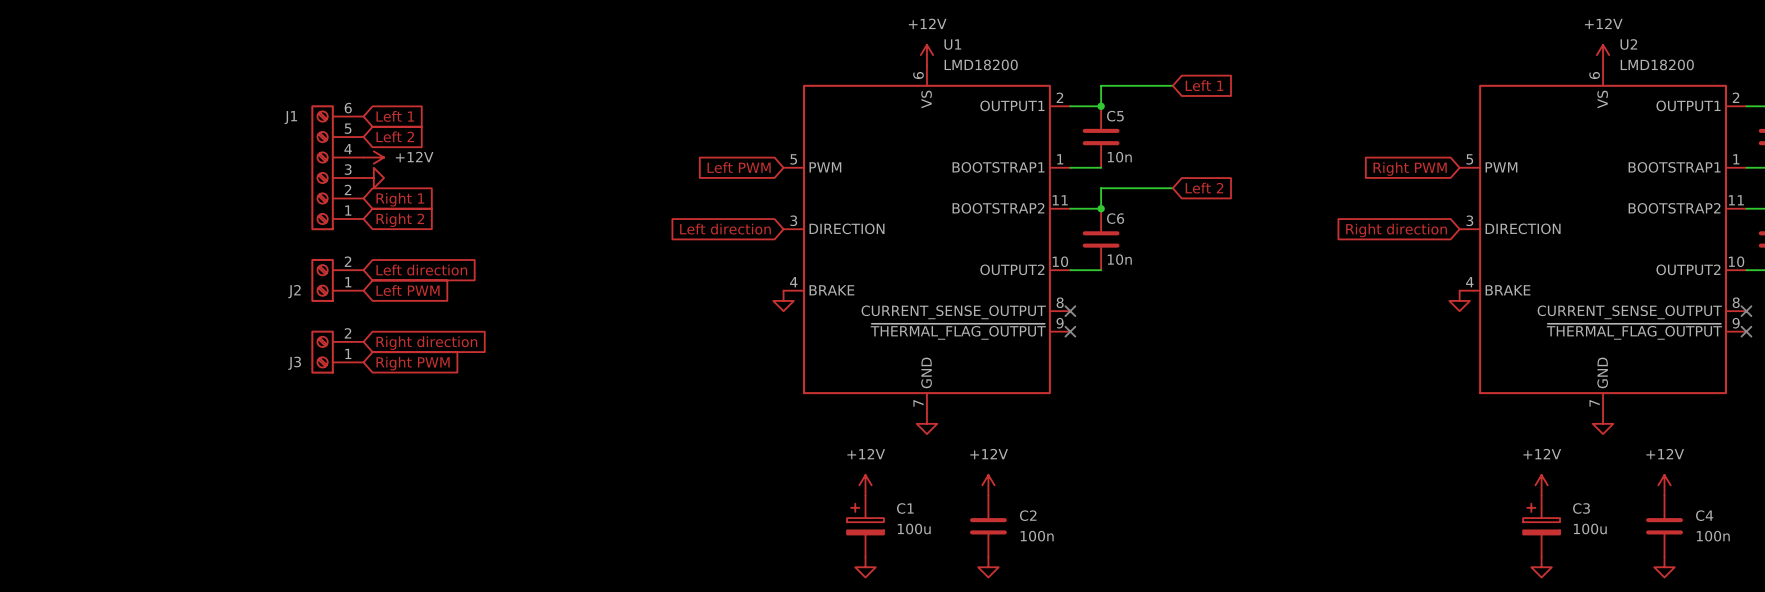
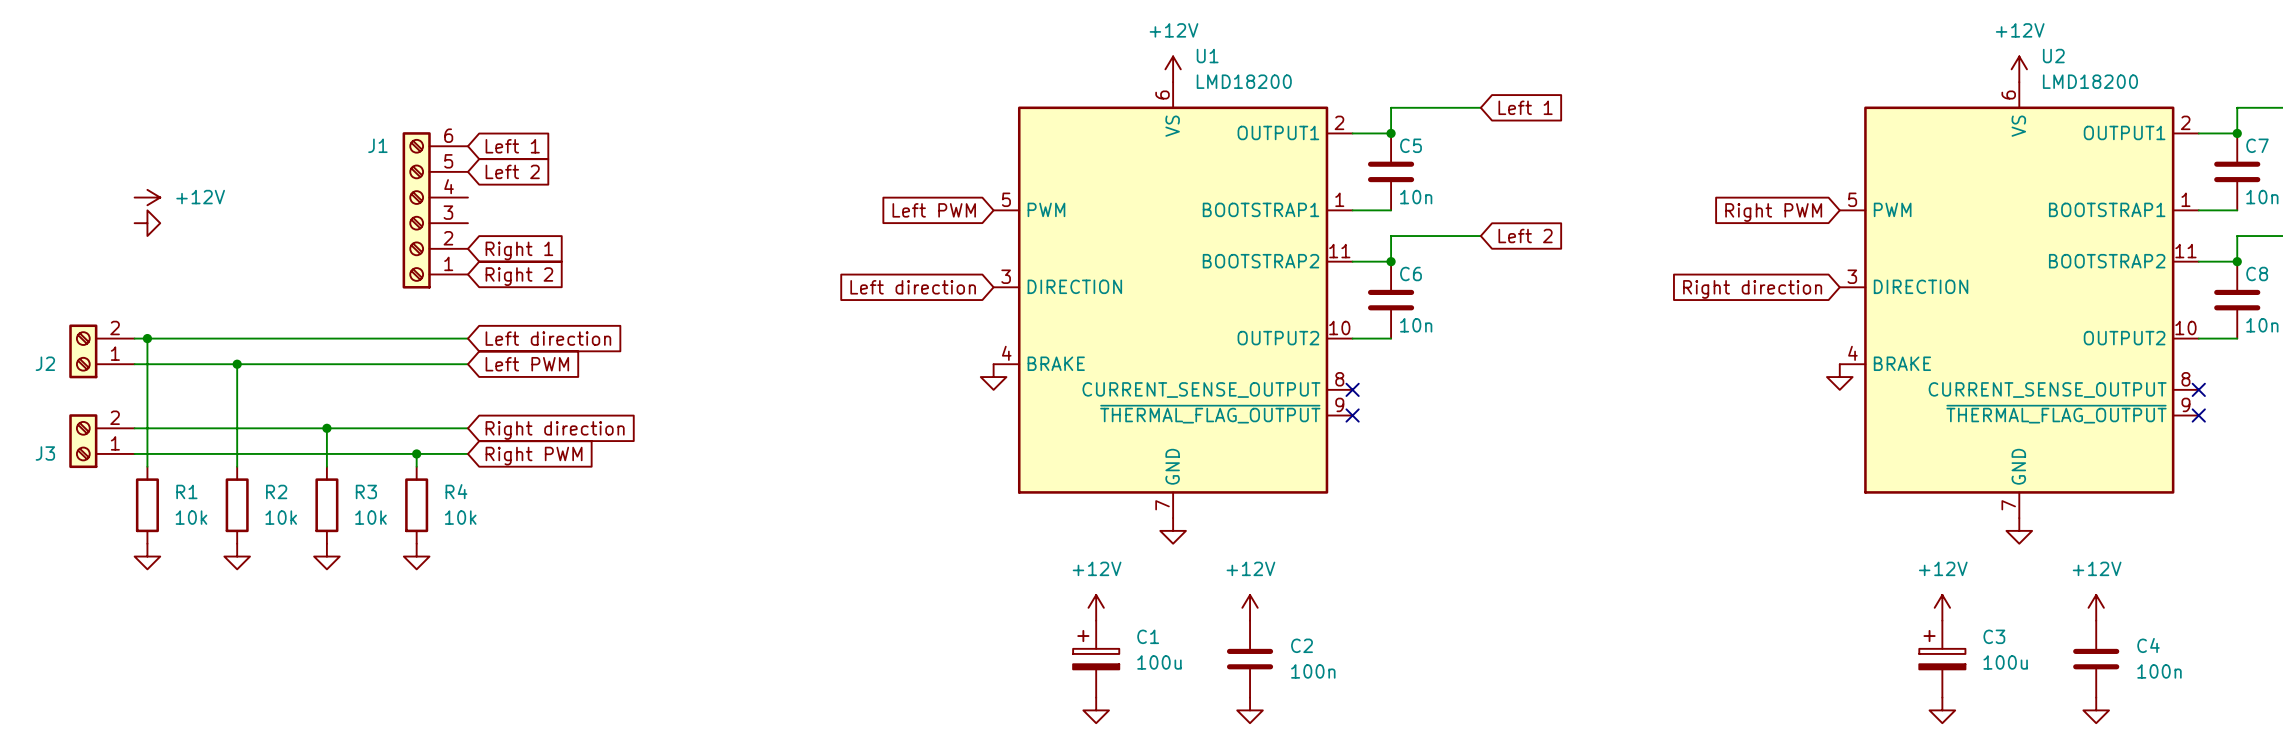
power symbol: none -> +12V (147, 197)
power symbol: +12V (373, 157) -> none
power symbol: none -> (147, 223)
power symbol: (373, 178) -> none
wire: none -> (134, 338) (467, 338)
wire: none -> (147, 338) (147, 466)
junction: none -> (147, 338)
J2 position: (337, 280) -> (101, 351)
wire: none -> (134, 364) (467, 364)
wire: none -> (237, 364) (237, 466)
junction: none -> (237, 364)
wire: none -> (134, 428) (467, 428)
wire: none -> (326, 428) (326, 466)
junction: none -> (326, 428)
J3 position: (337, 352) -> (101, 441)
wire: none -> (134, 453) (467, 453)
junction: none -> (416, 453)
R1: none -> 10k (147, 505)
R2: none -> 10k (237, 505)
R3: none -> 10k (326, 505)
R4: none -> 10k (416, 505)
power symbol: none -> (147, 556)
power symbol: none -> (237, 556)
power symbol: none -> (326, 556)
power symbol: none -> (416, 556)

